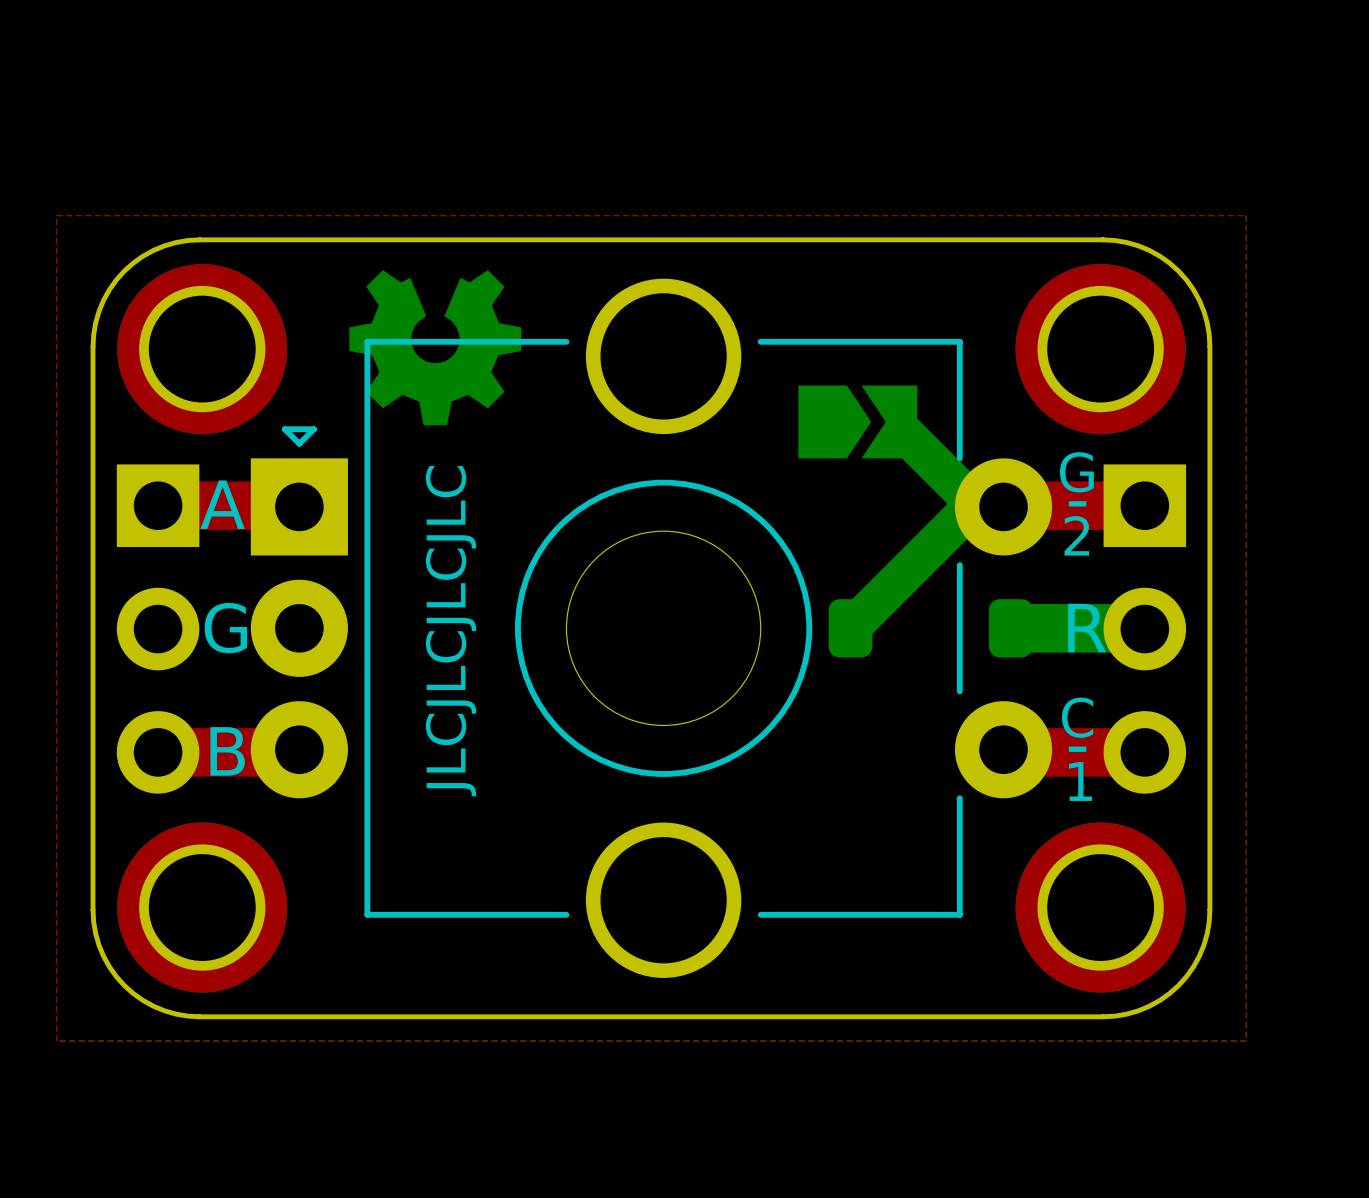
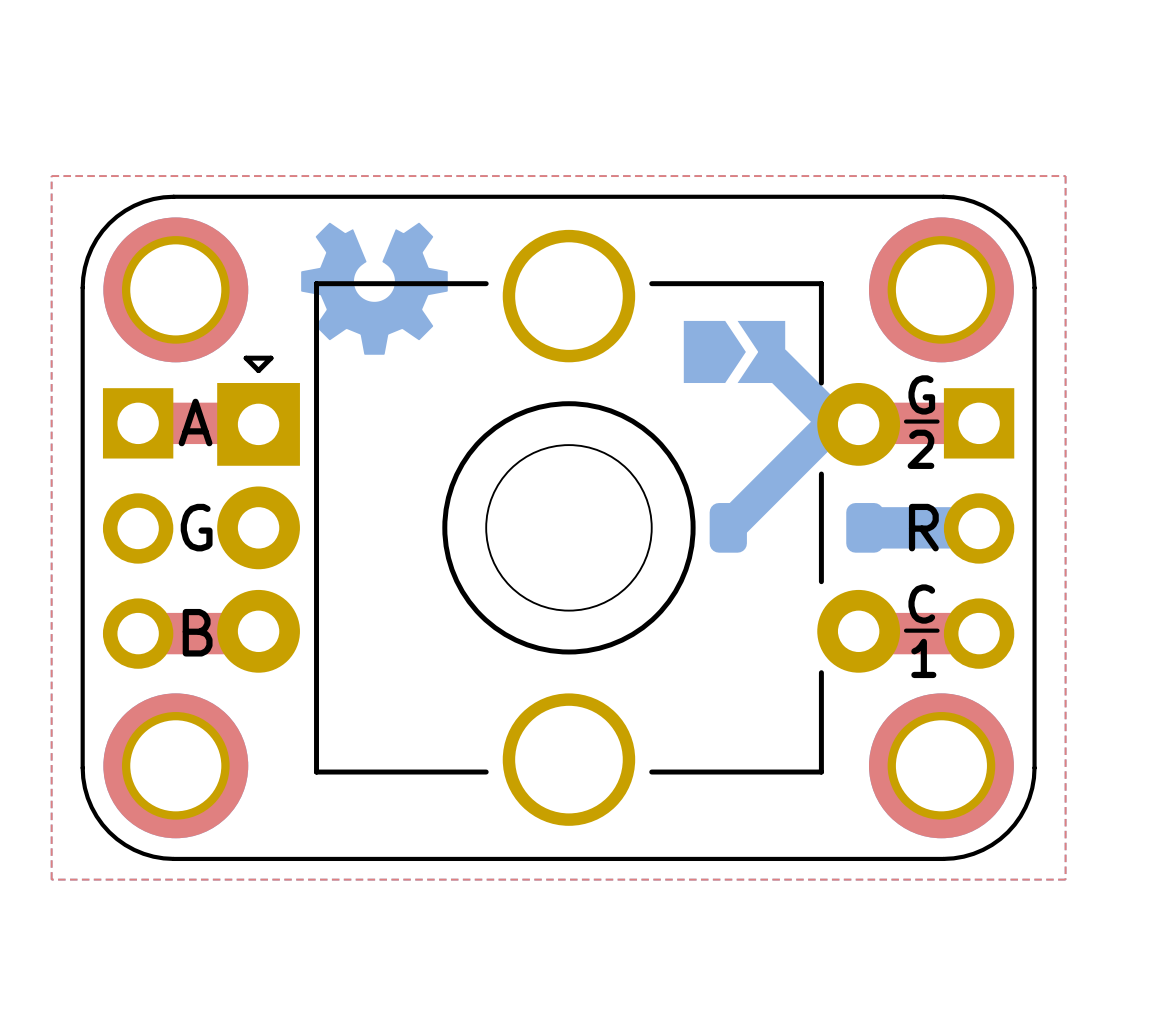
text: JLCJLCJLCJLC (451, 631) -> none

